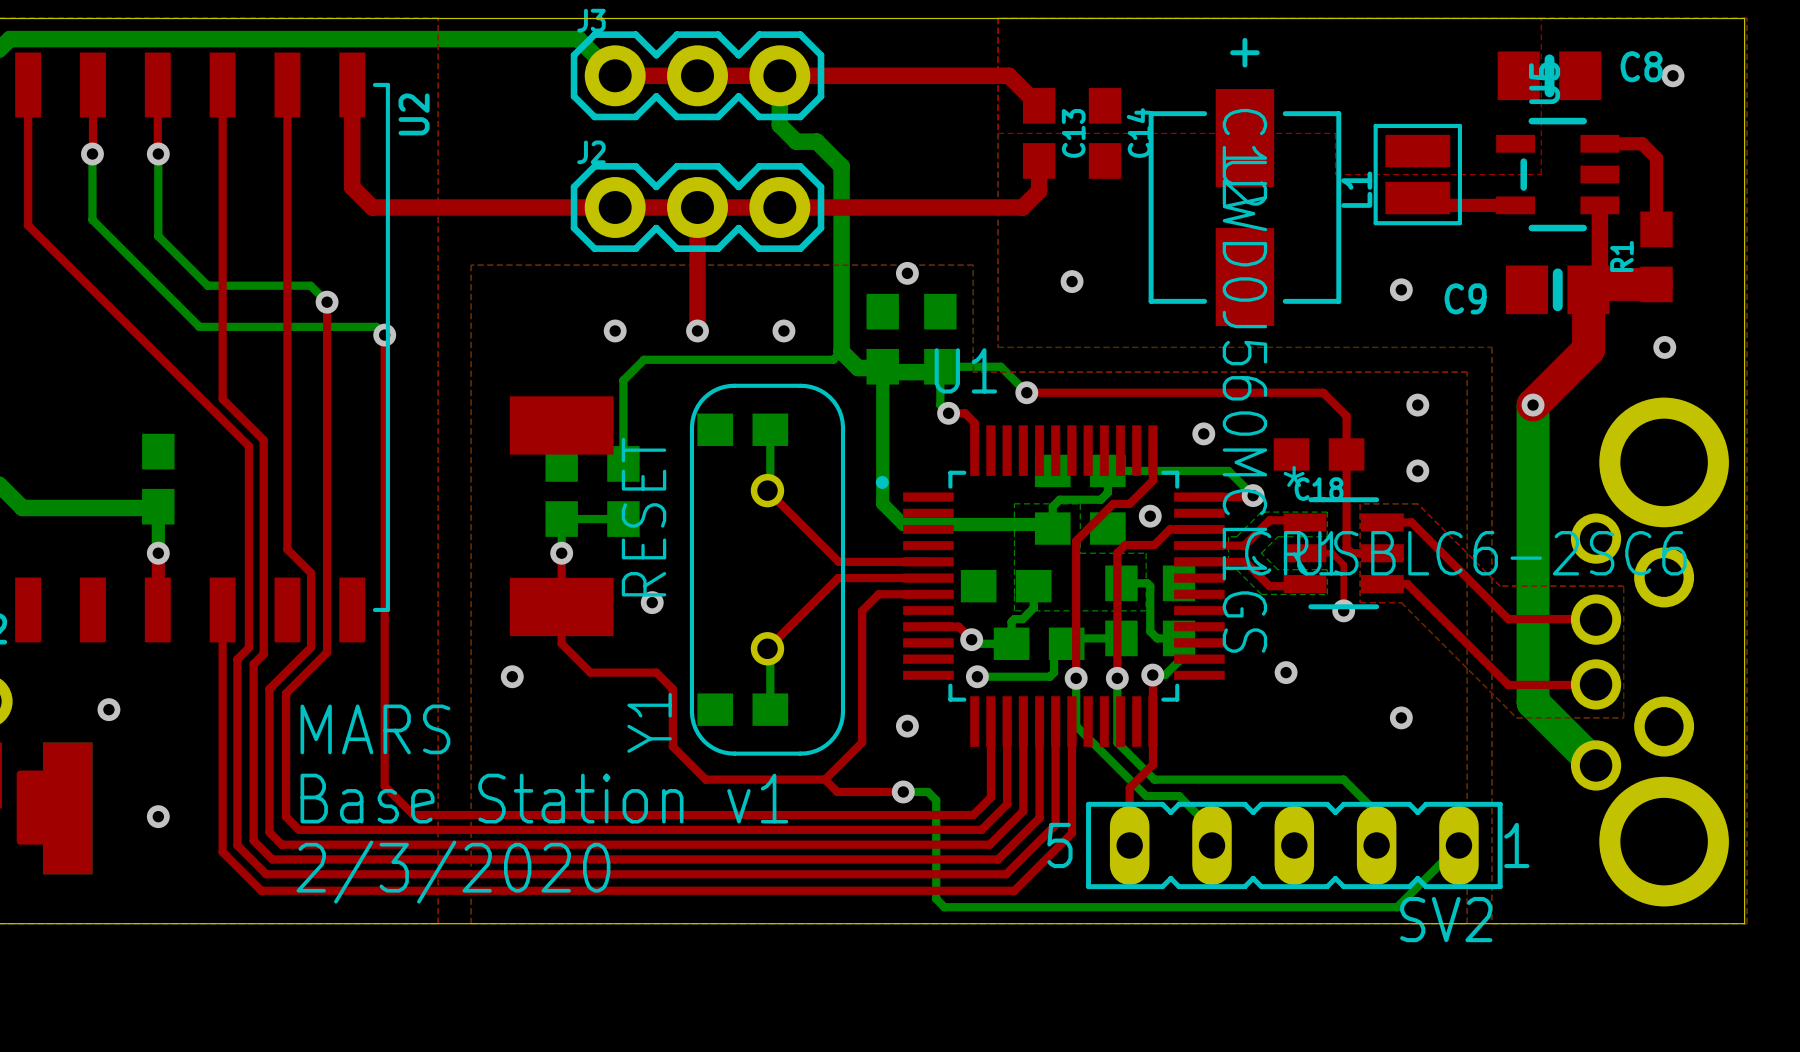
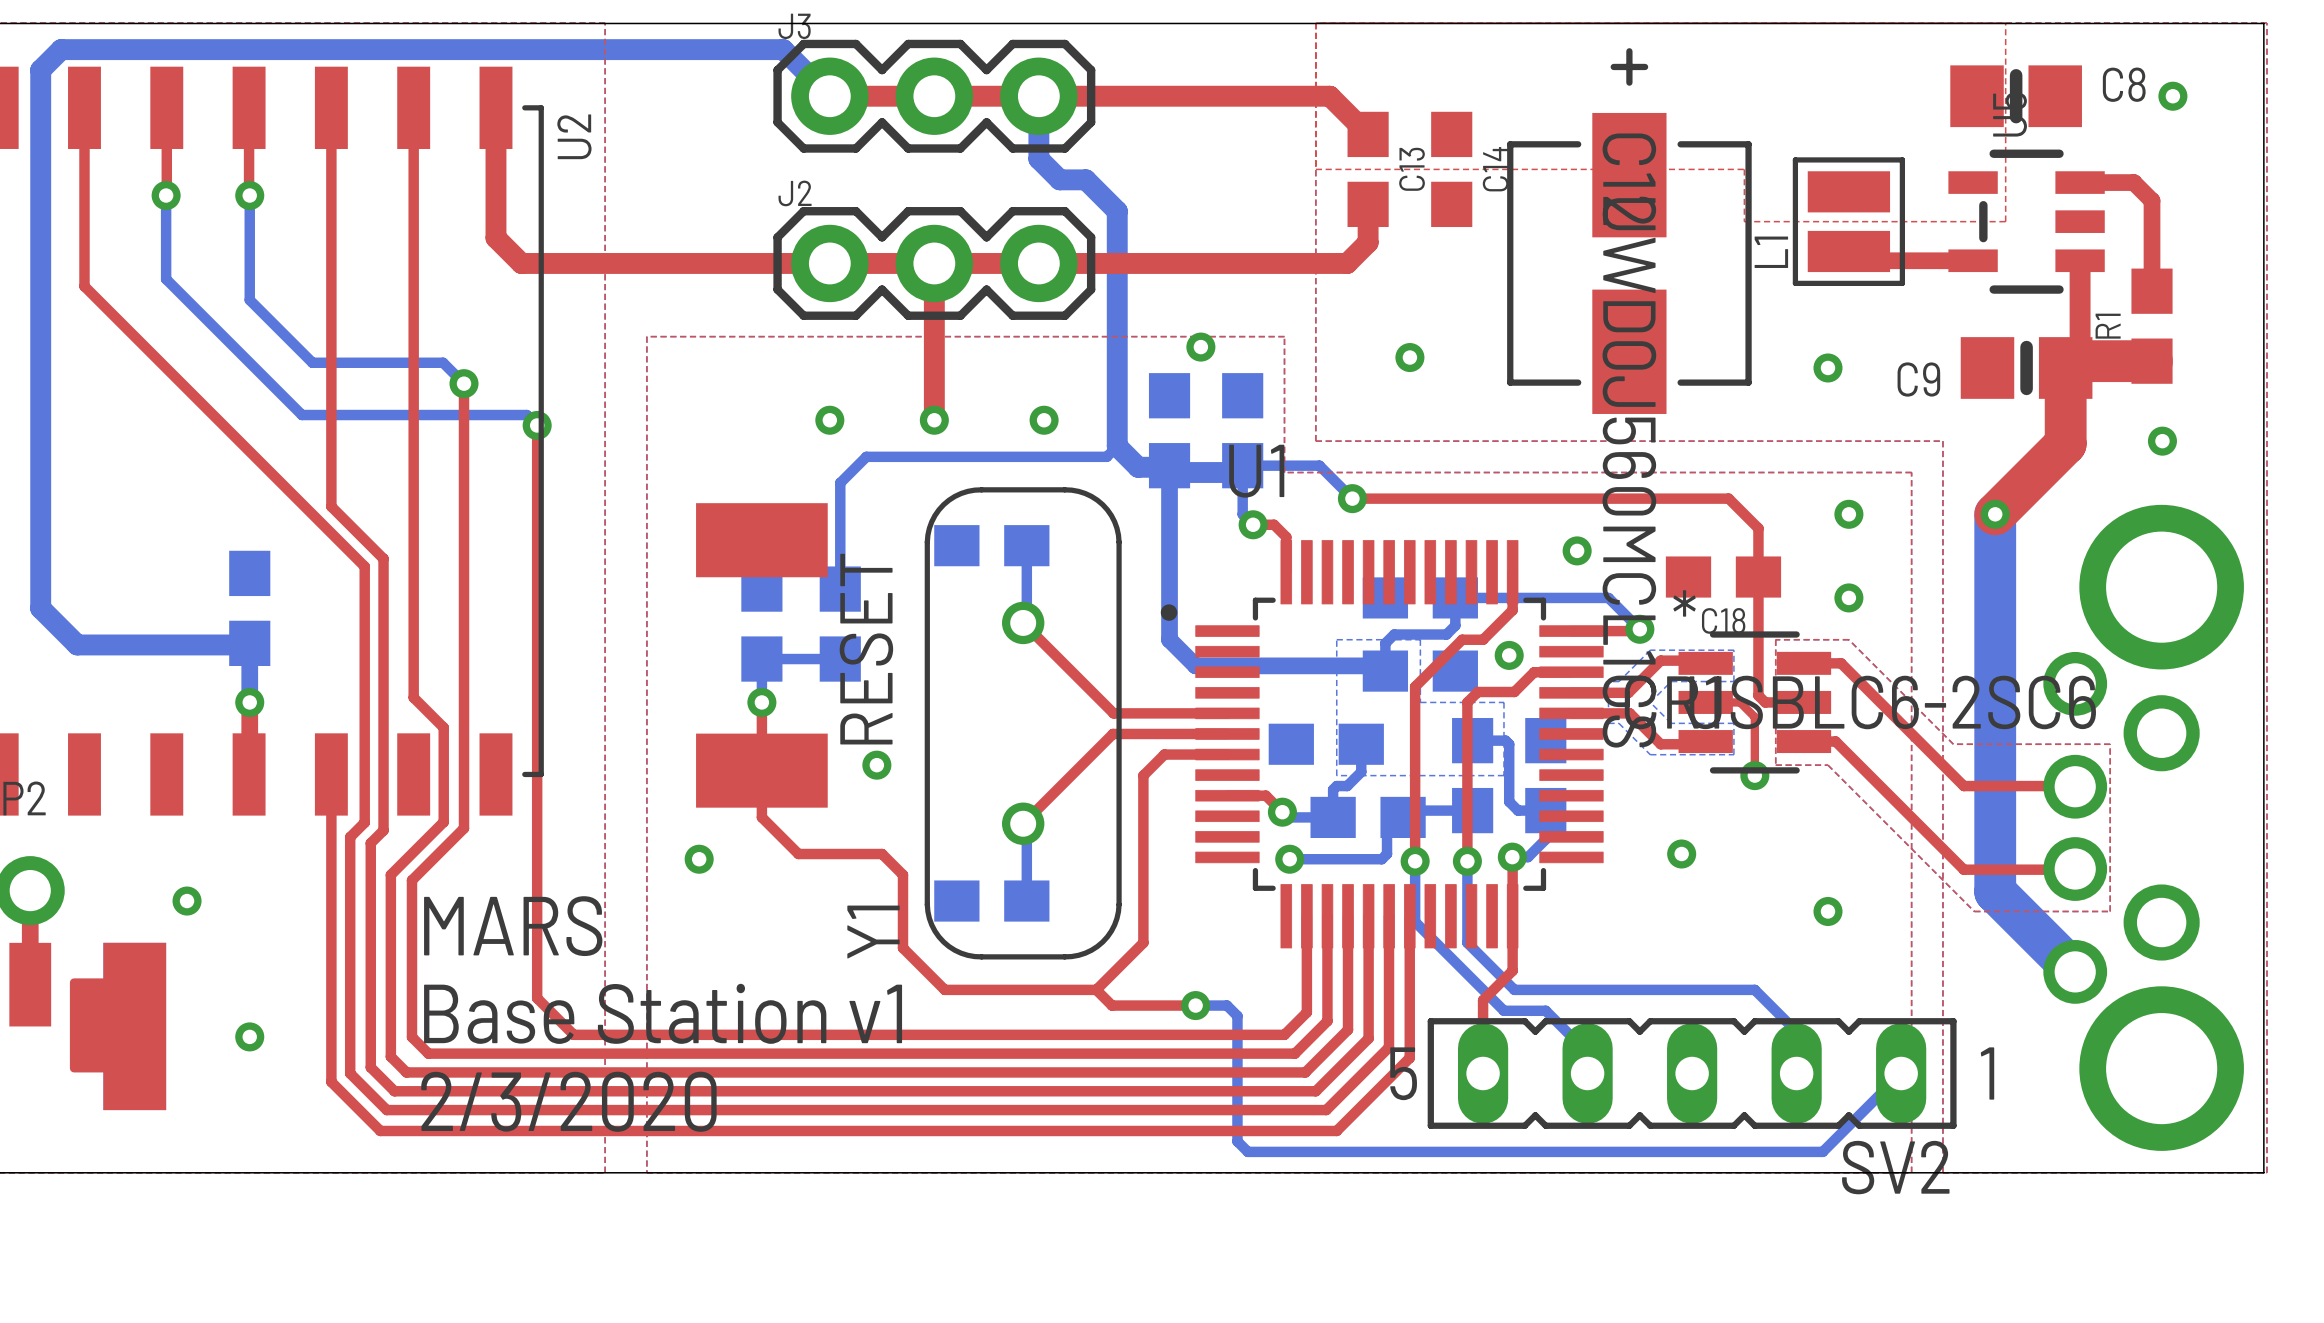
via: (907, 726) -> none

